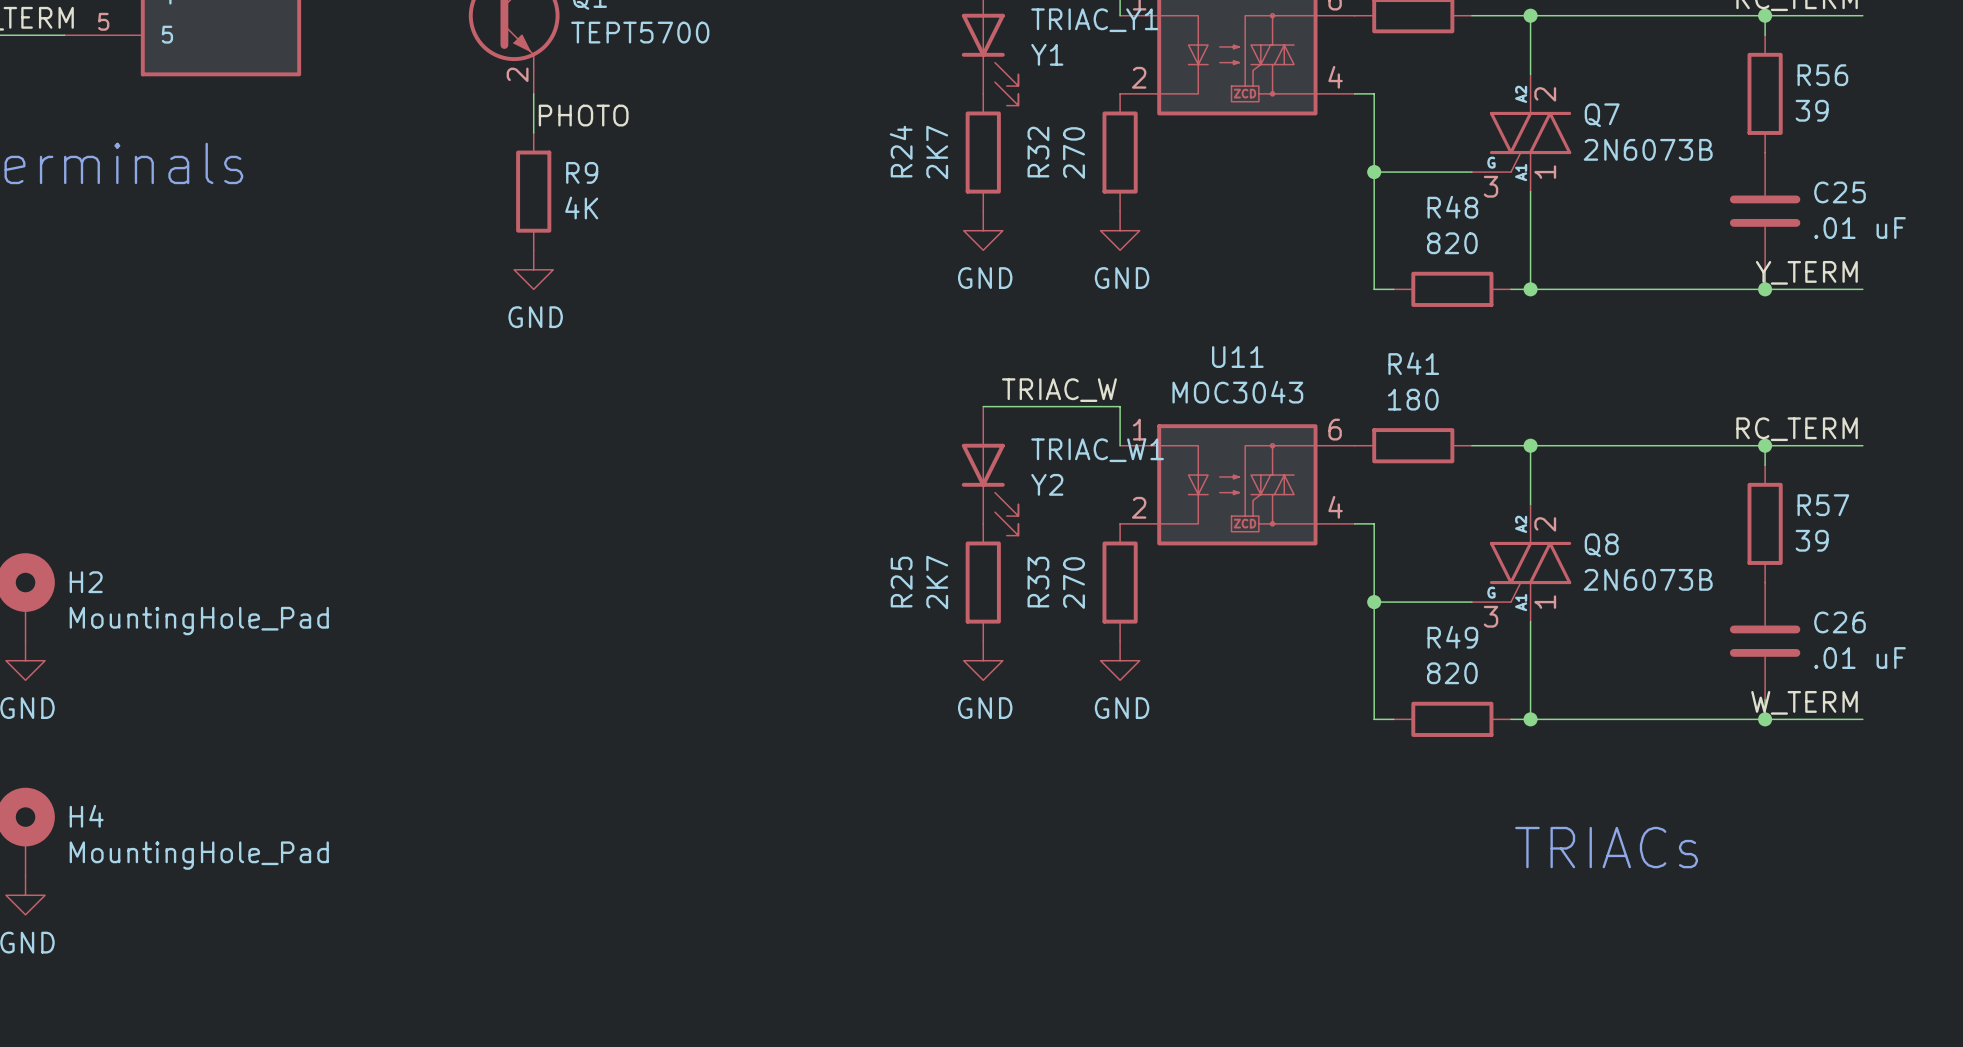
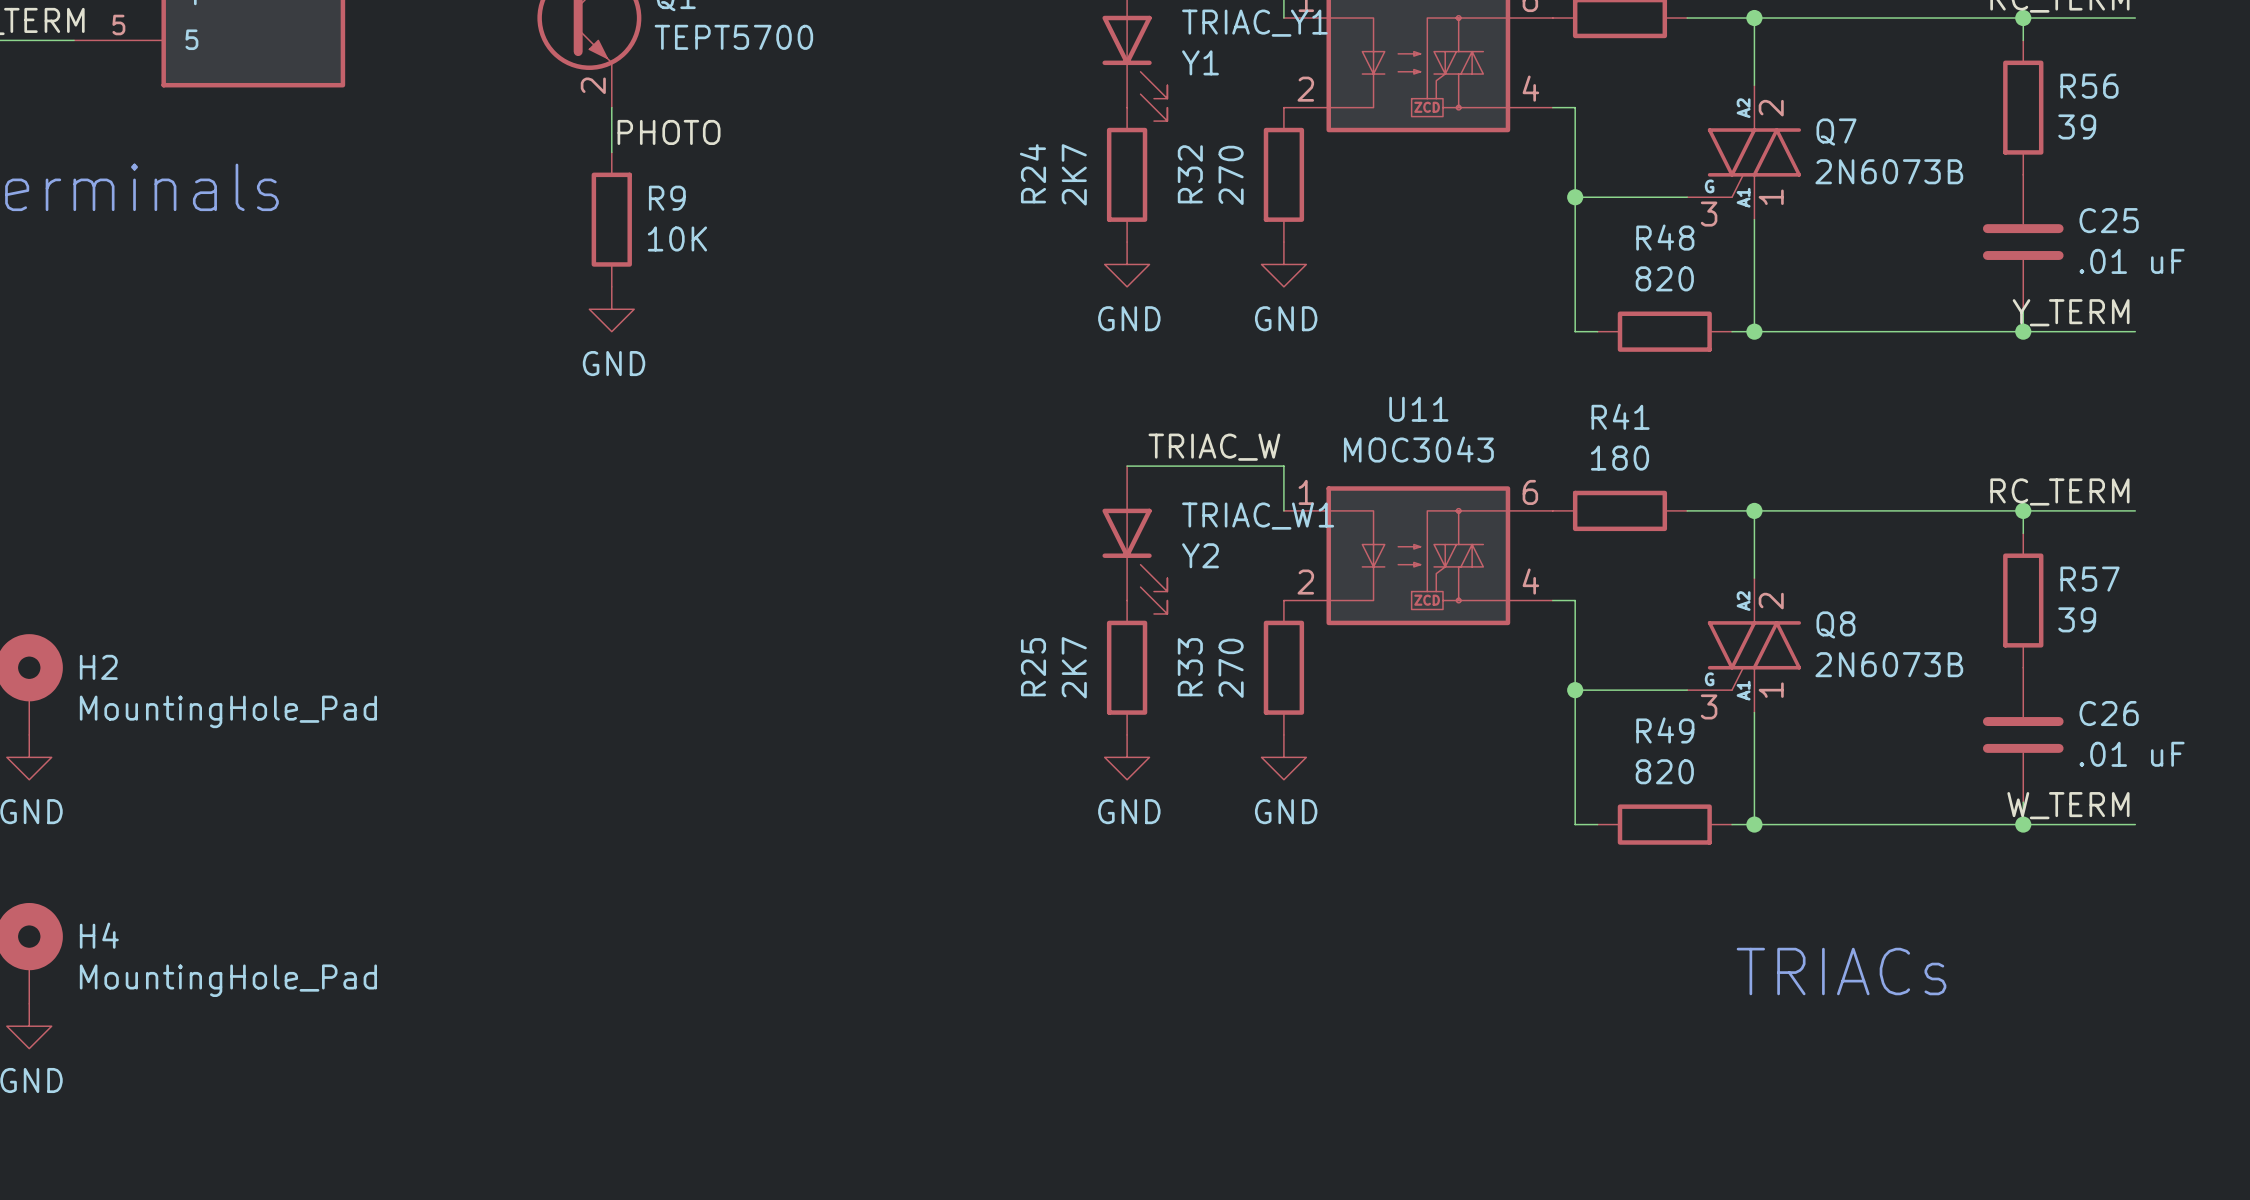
R9 value: 4K (581, 208) -> 10K (677, 238)

